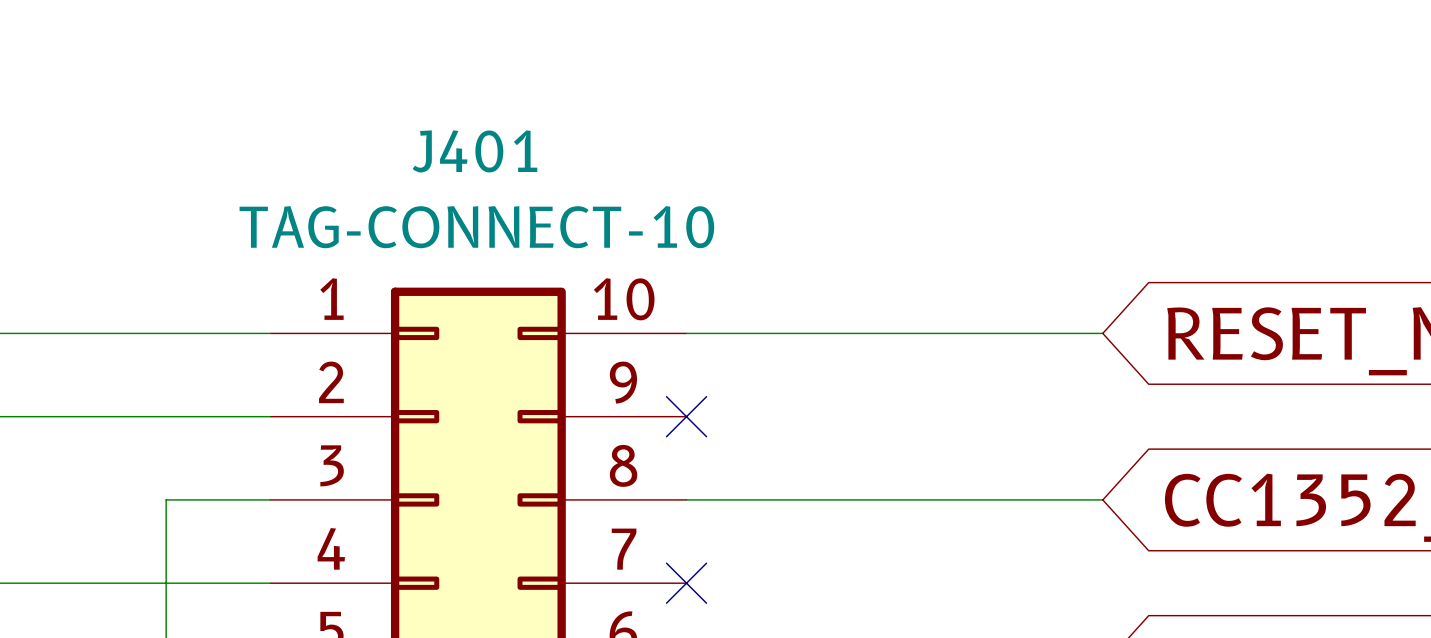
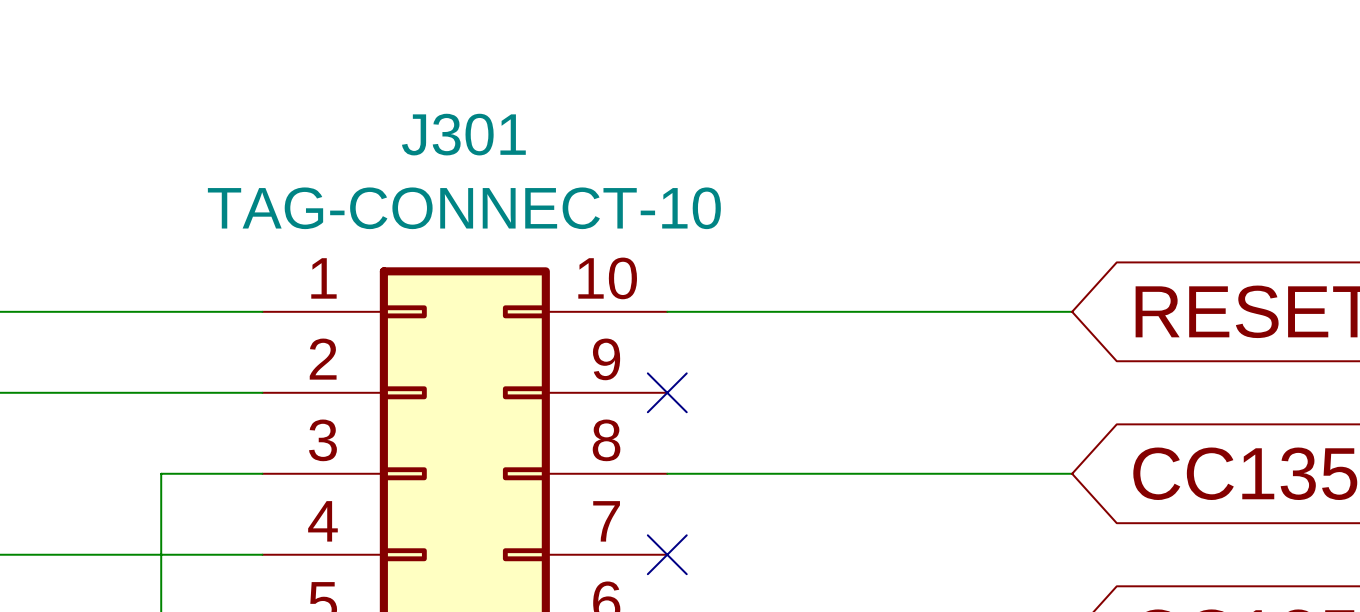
J401 name: J401 (474, 151) -> J301 (463, 134)

